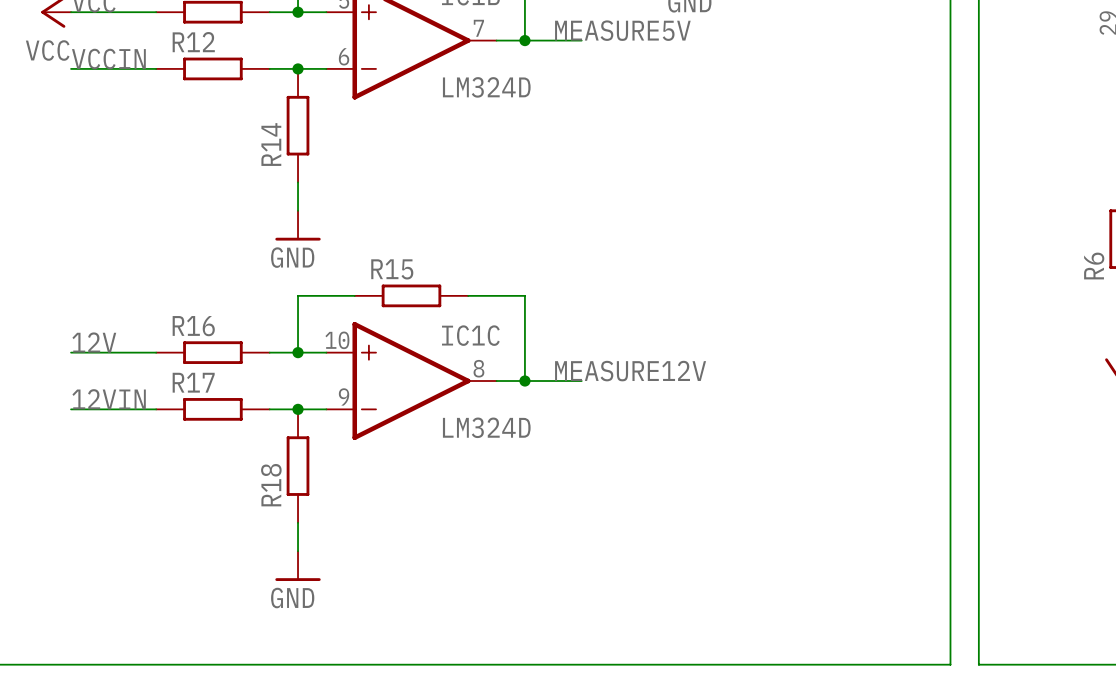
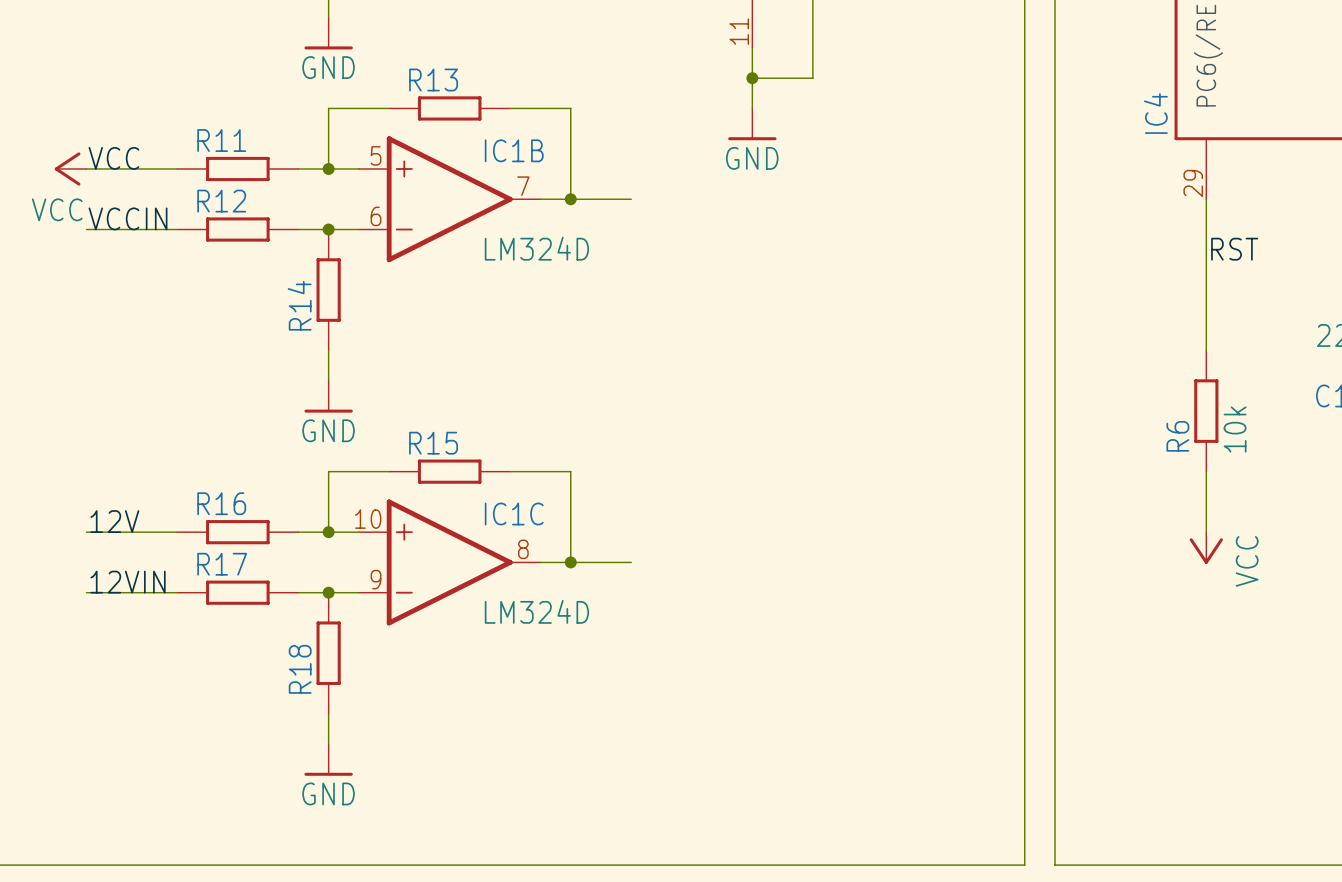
label: MEASURE5V (622, 30) -> none
label: MEASURE12V (630, 371) -> none

